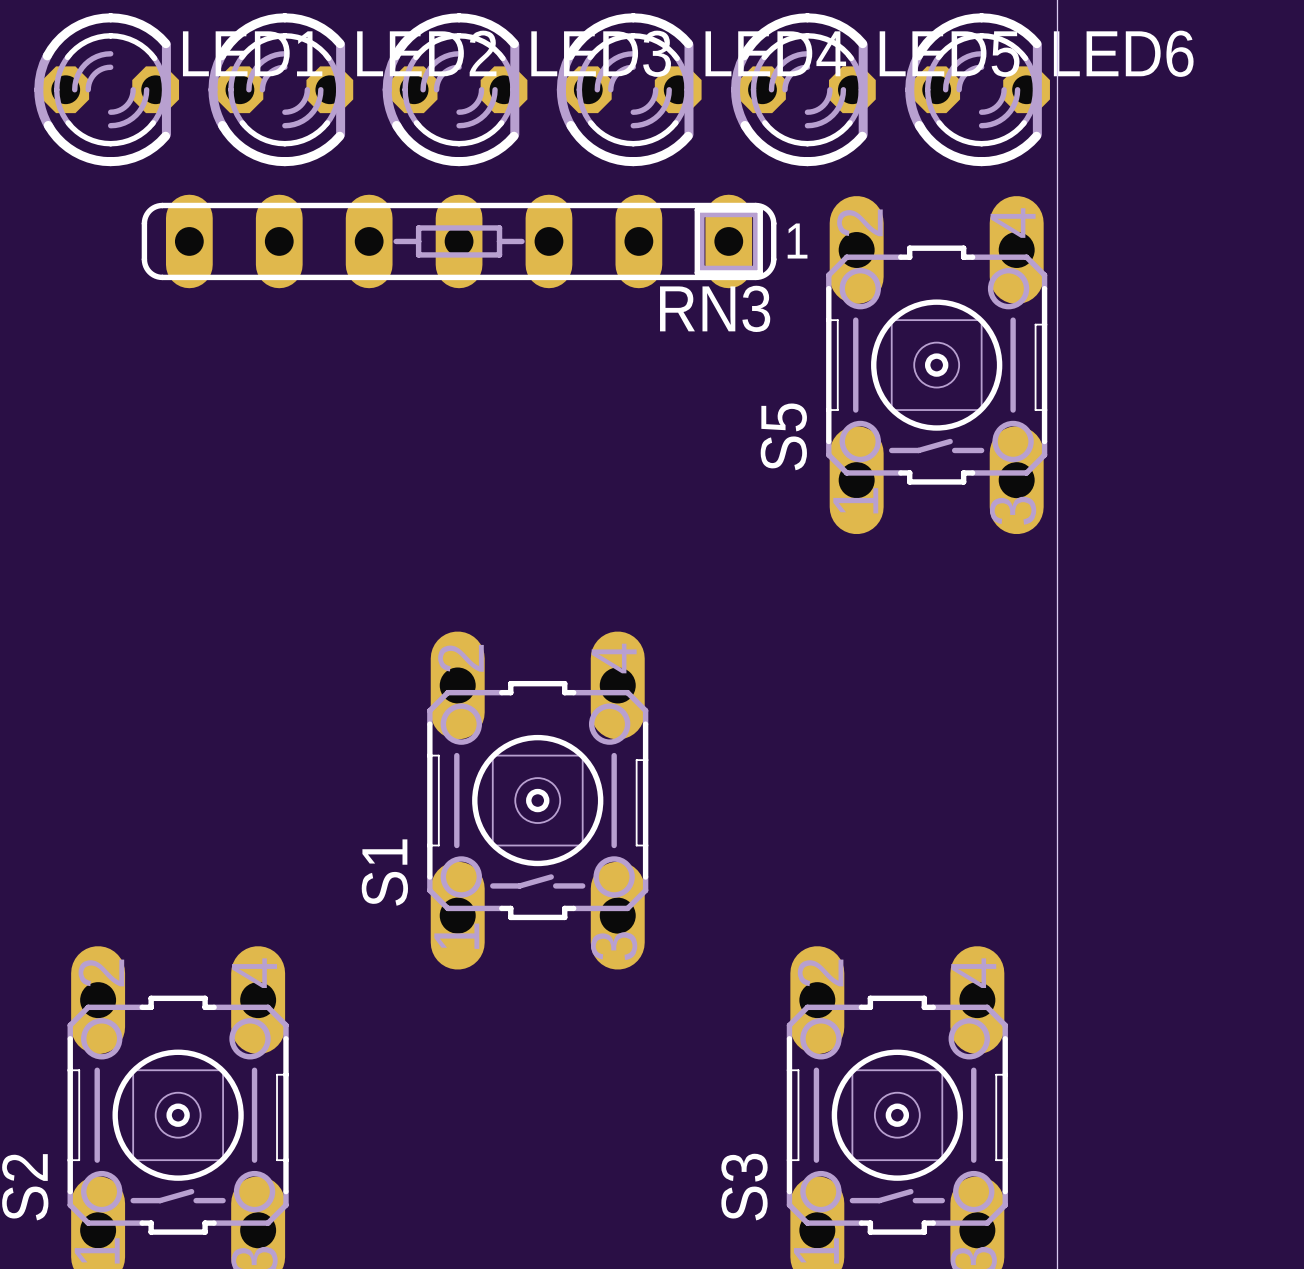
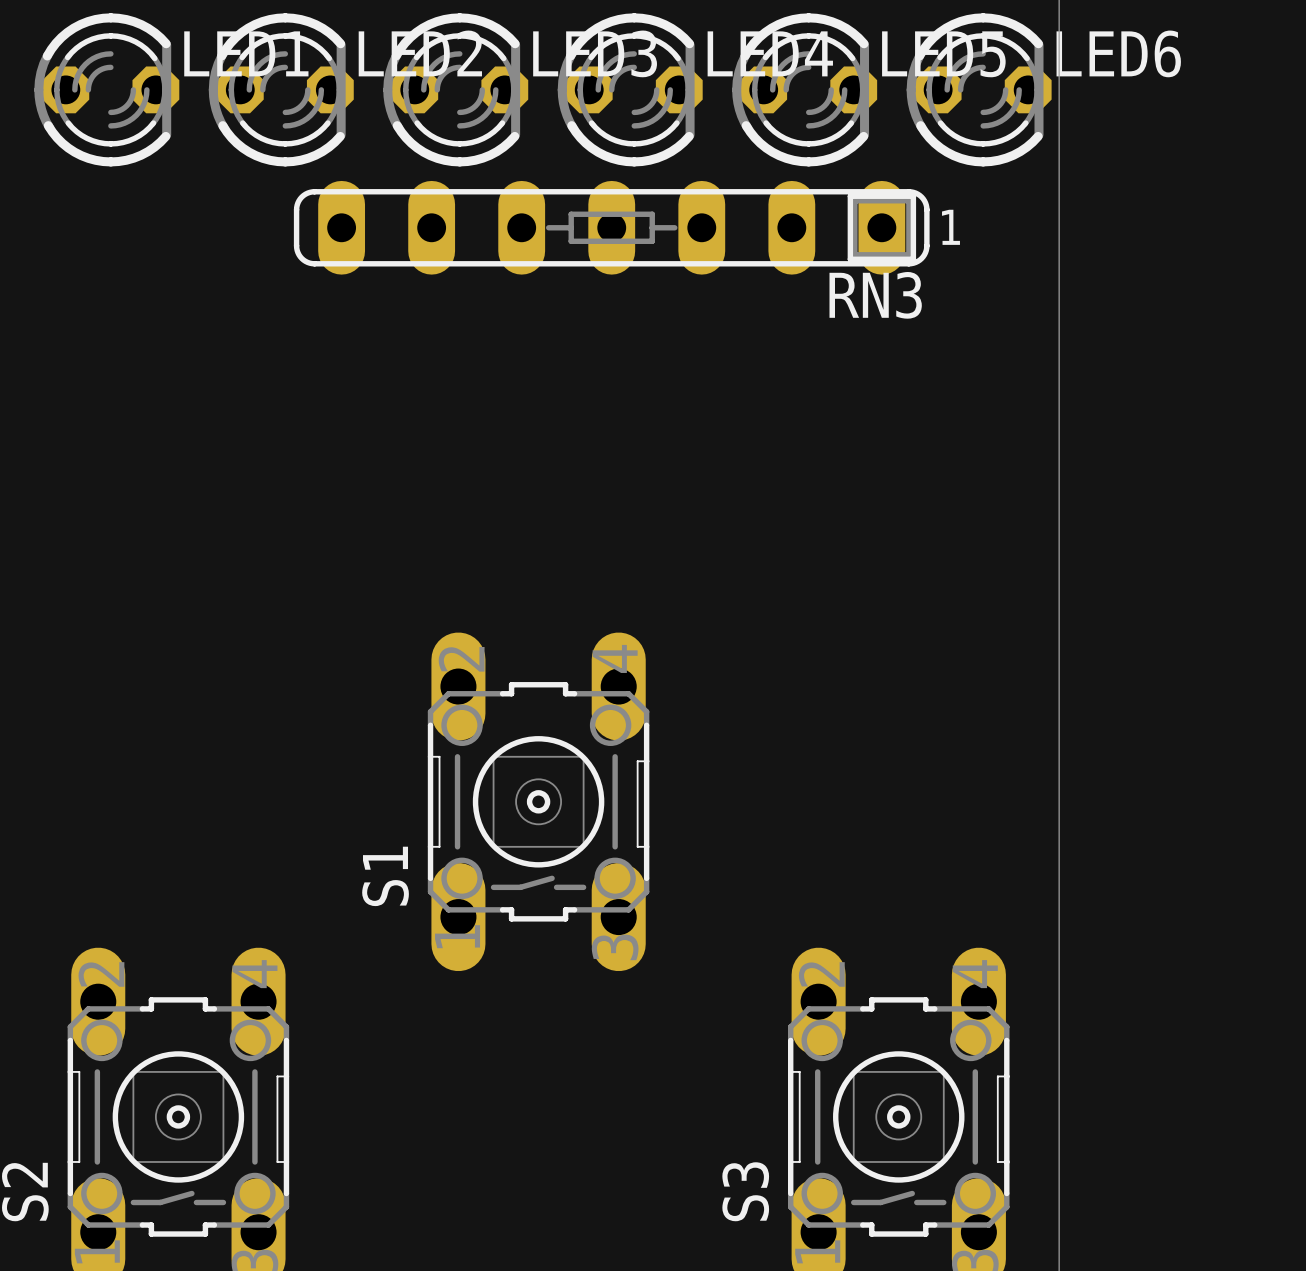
RN3 position: (459, 241) -> (611, 227)
S5: (936, 365) -> none

